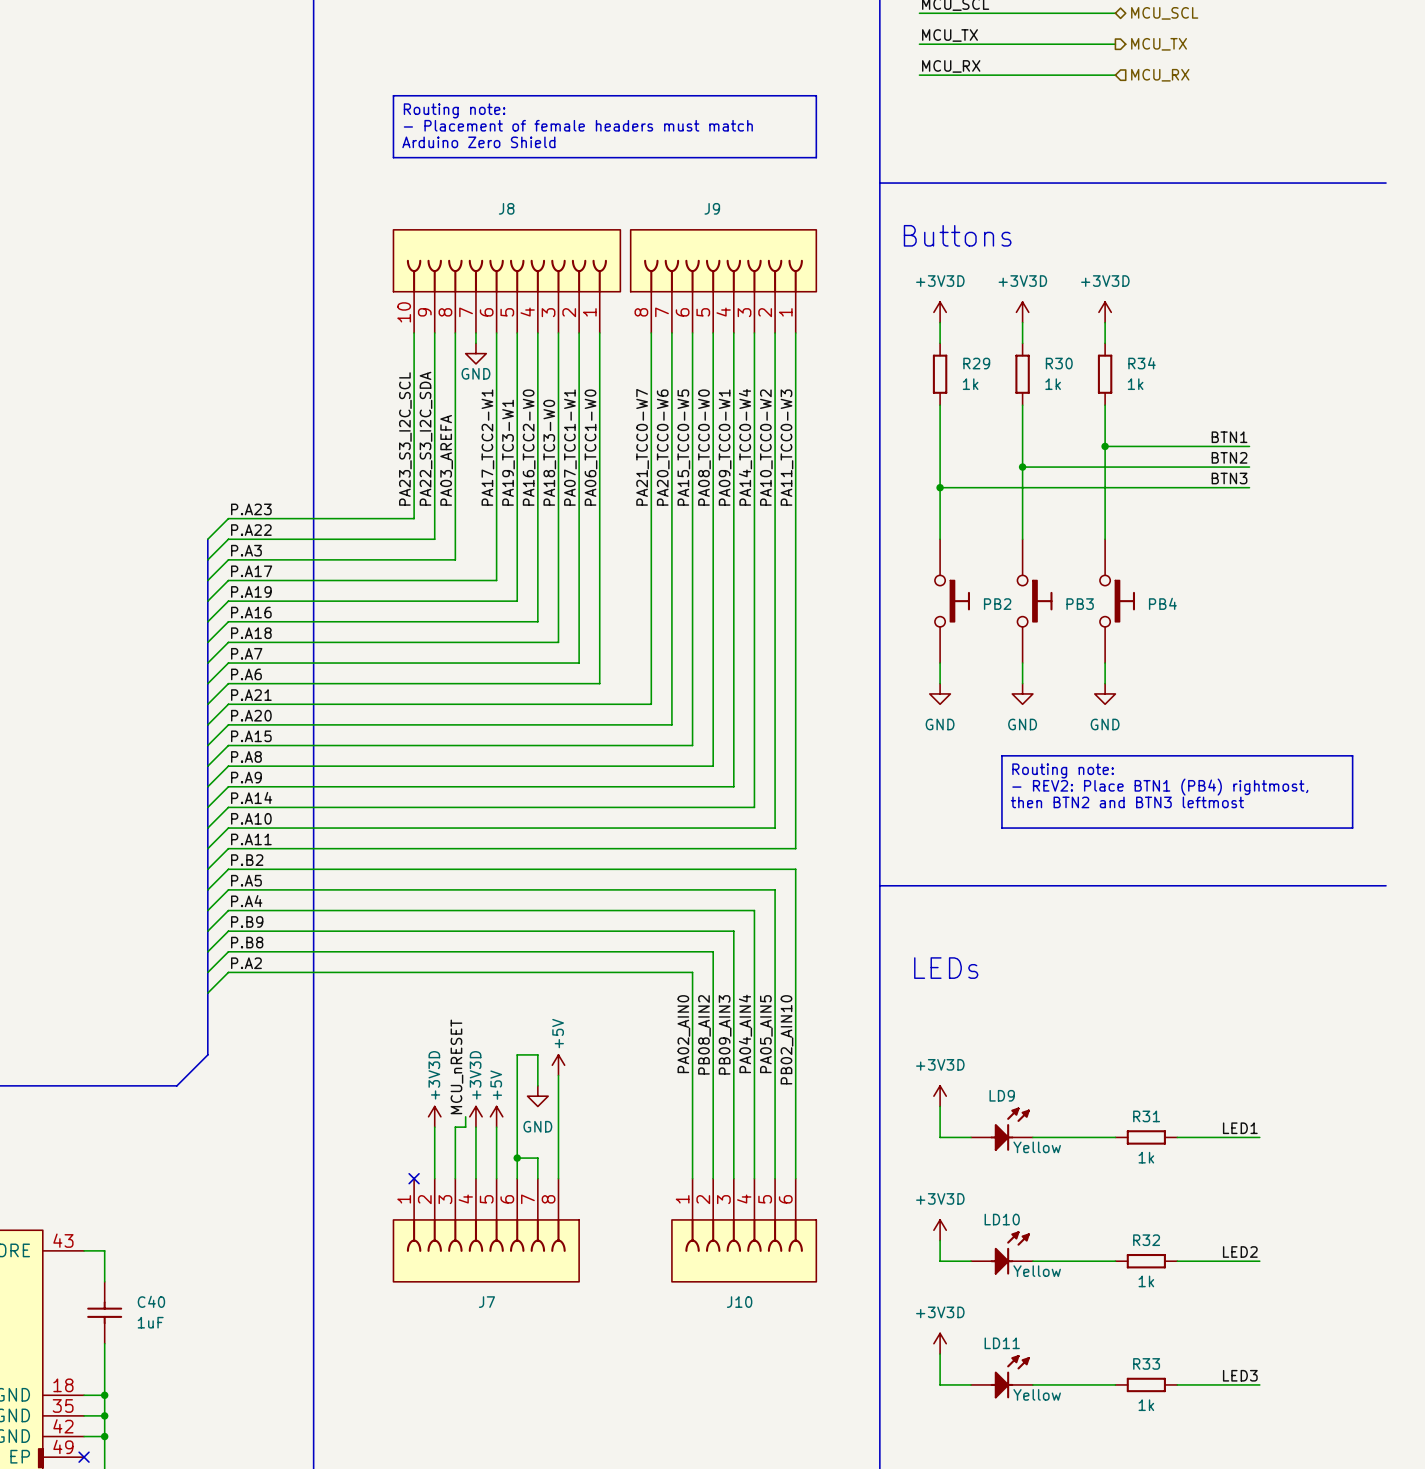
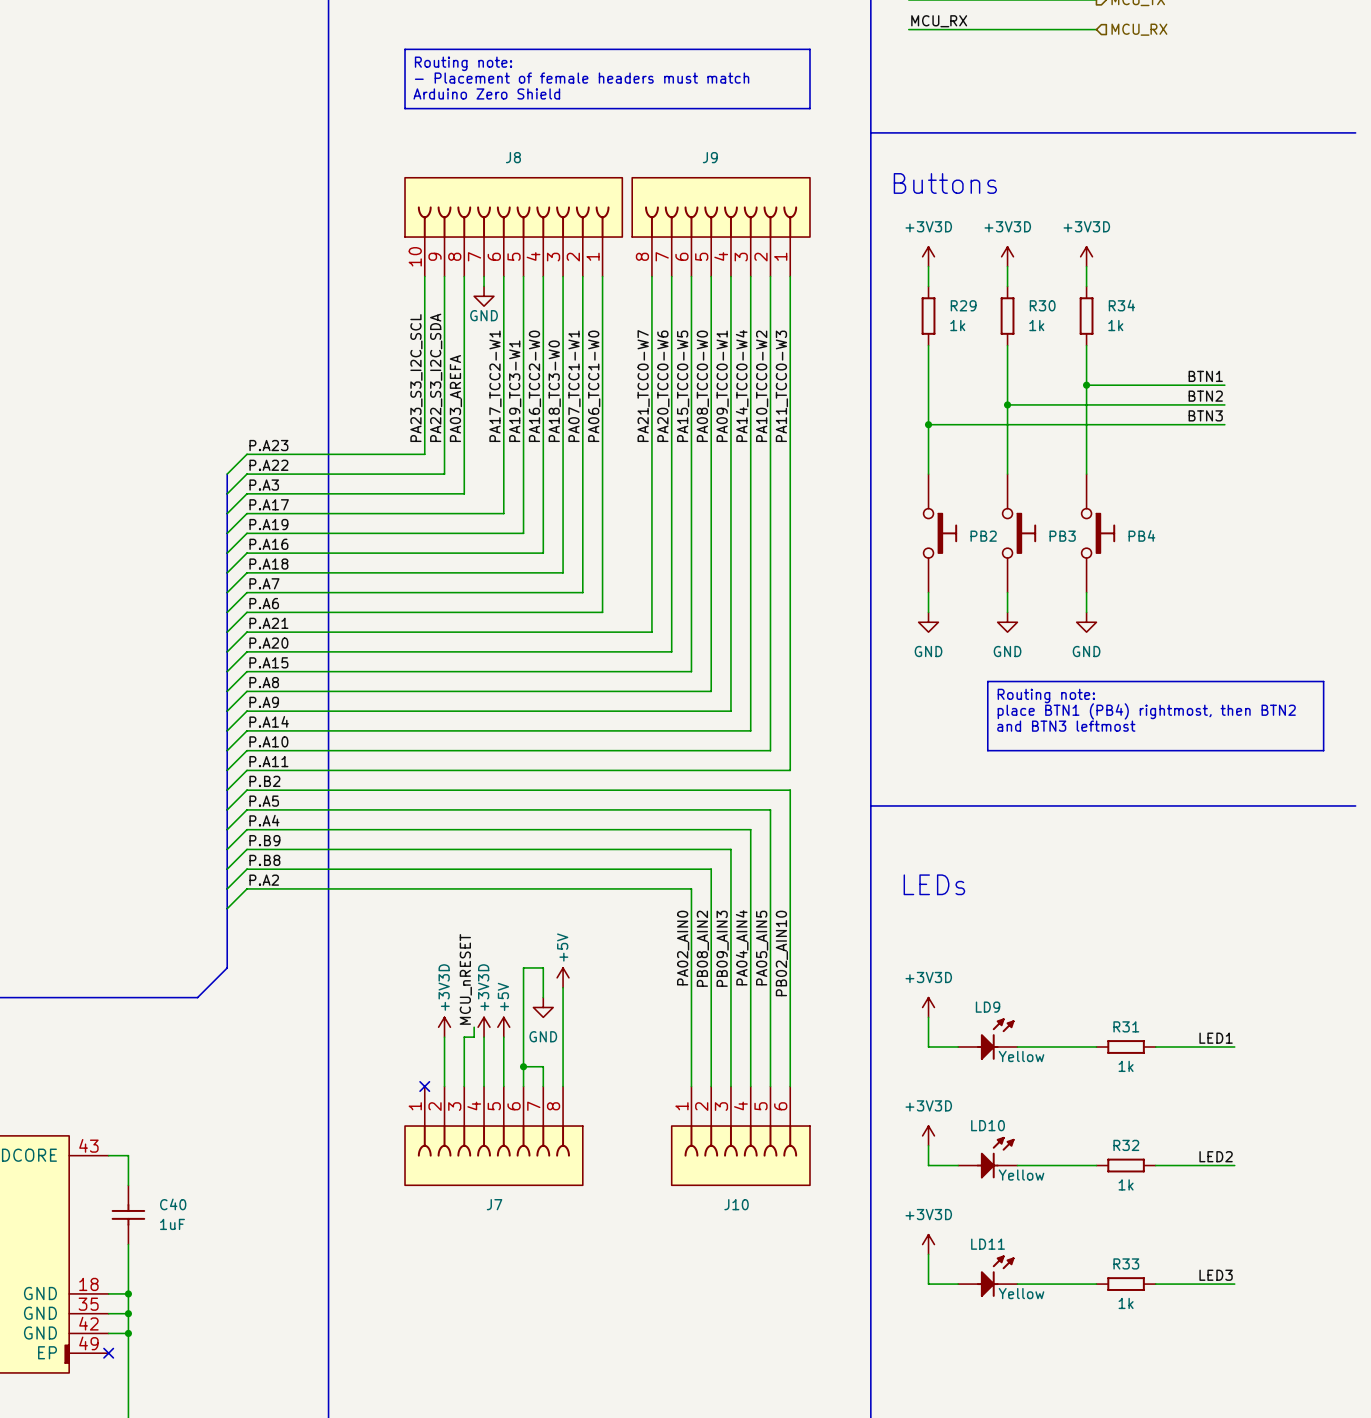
text: - REV2: Place BTN1 (PB4) rightmost, (1160, 787) -> place BTN1 (PB4) rightmost, then BTN2 (1146, 711)
text: then BTN2 and BTN3 leftmost (1127, 802) -> and BTN3 leftmost (1066, 726)

